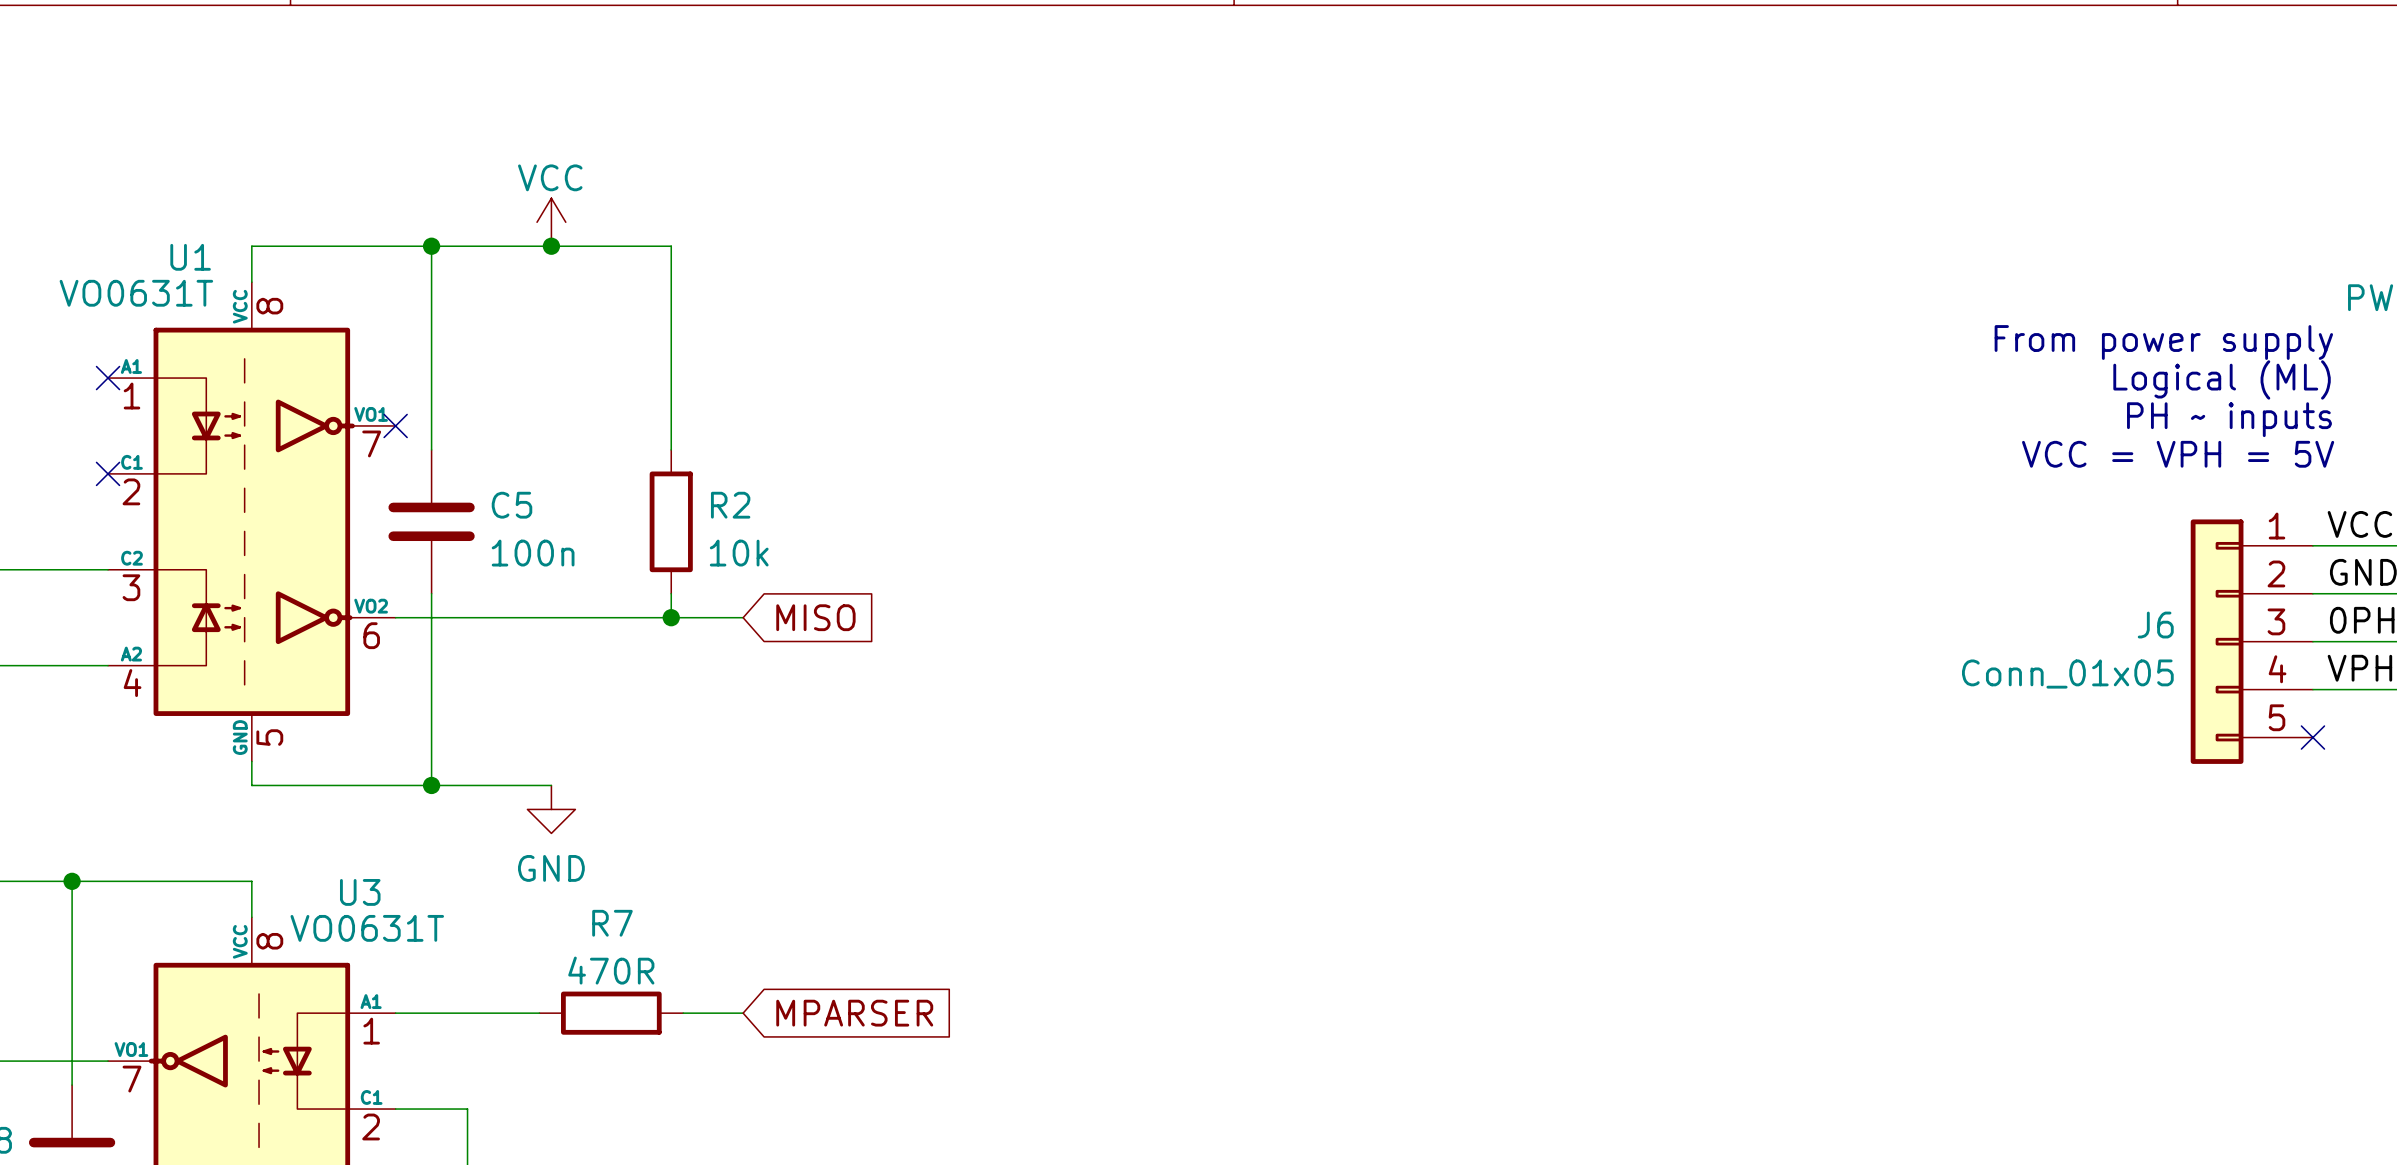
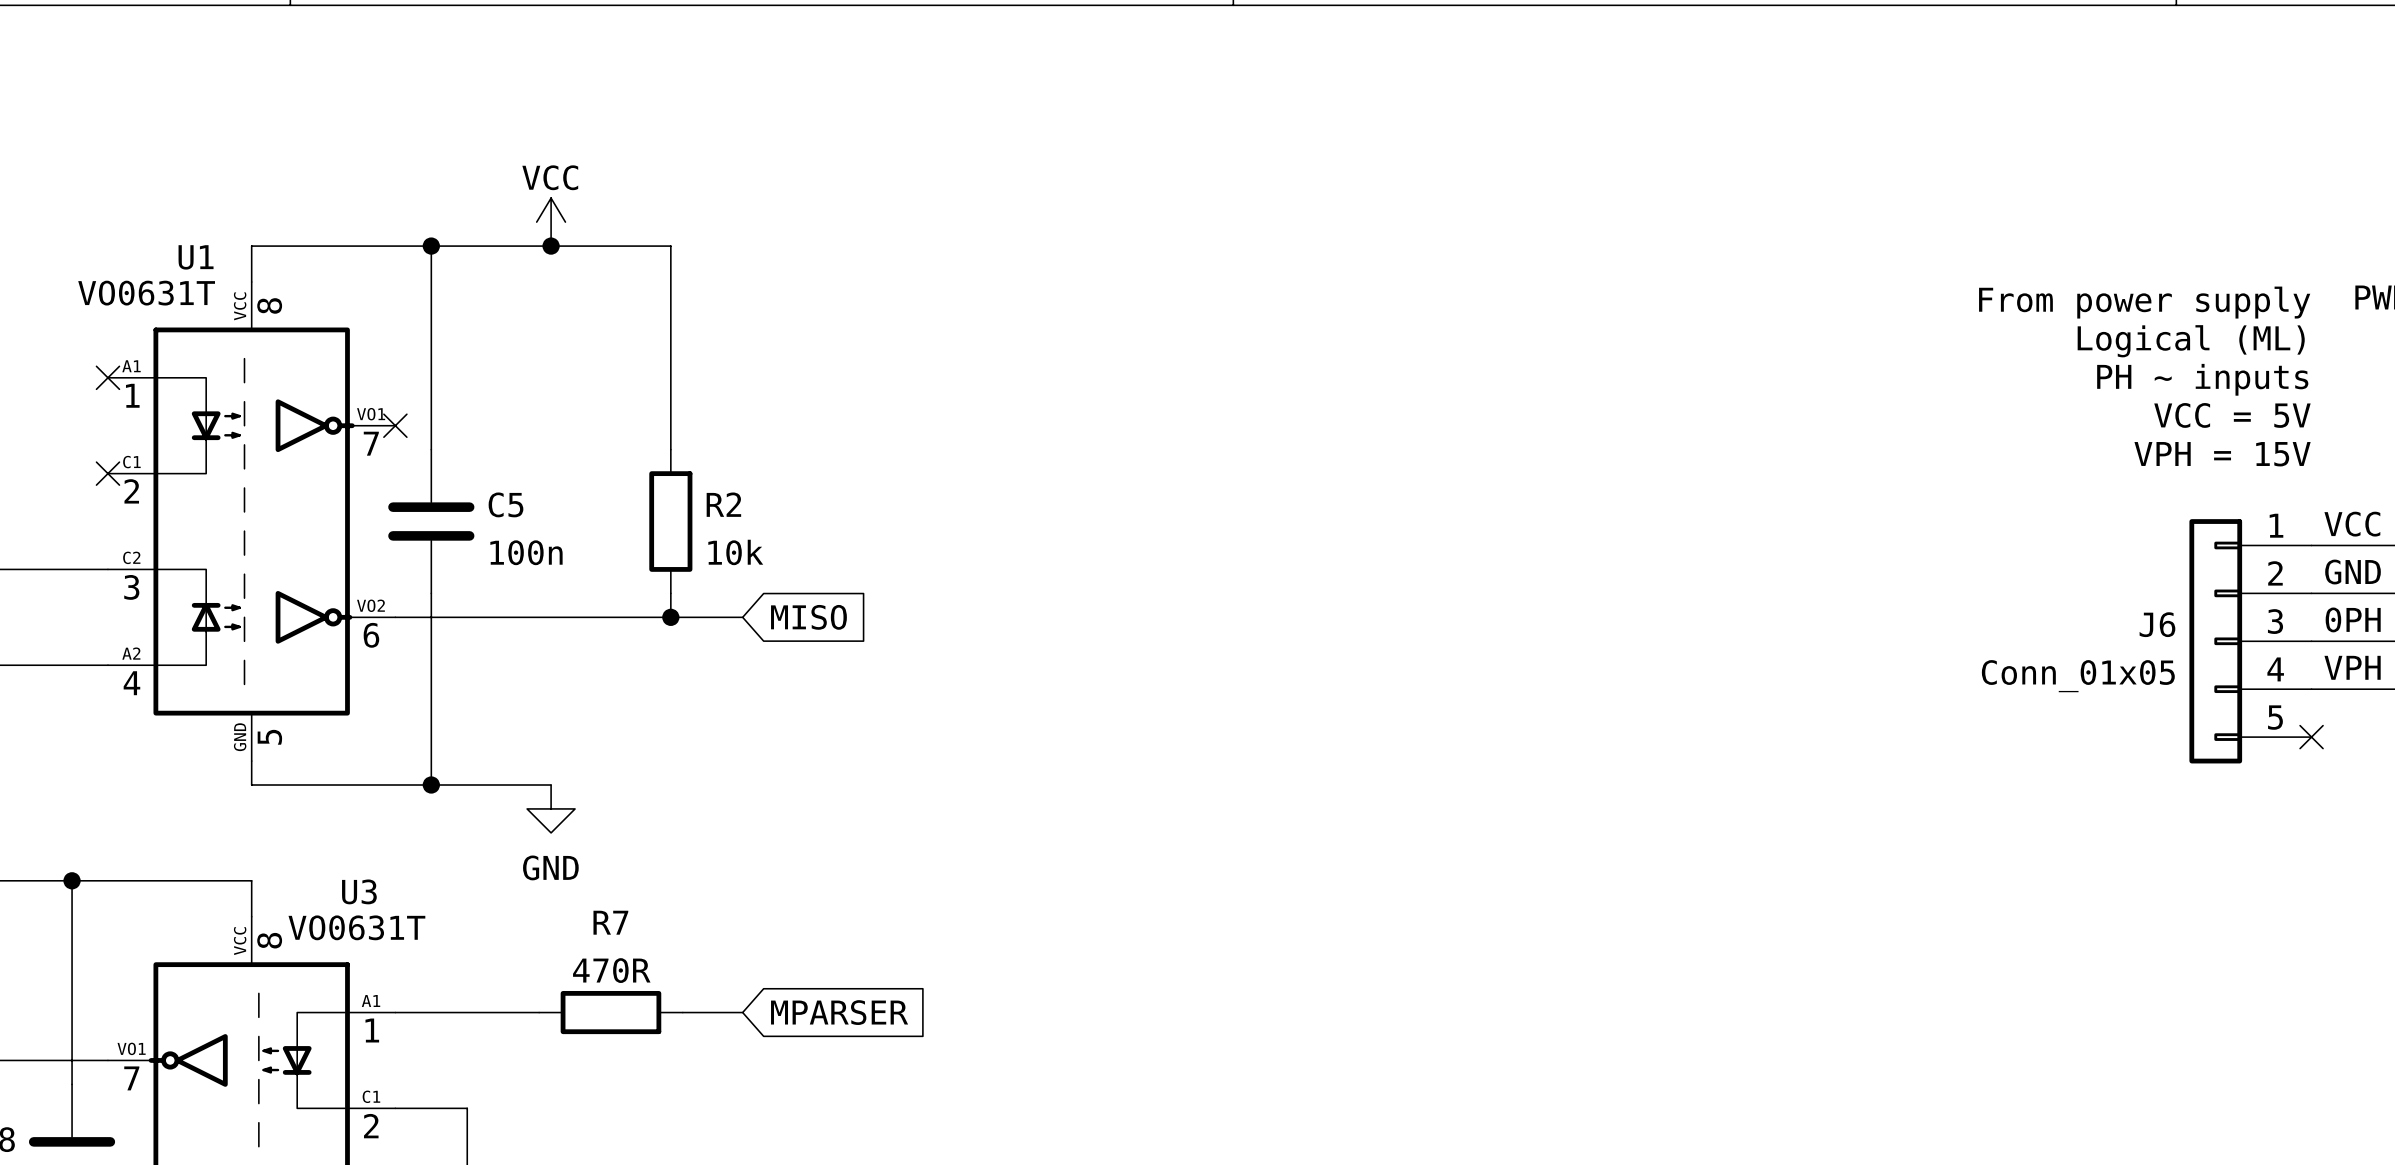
text position: From power supply (2163, 342) -> From power supply (2144, 302)
text position: Logical (ML) (2222, 379) -> Logical (ML) (2191, 341)
text: none -> VCC = 5V (2232, 415)
text position: PH ~ inputs (2229, 419) -> PH ~ inputs (2202, 379)
text: VCC = VPH = 5V (2178, 454) -> none
text: none -> VPH = 15V (2222, 454)

